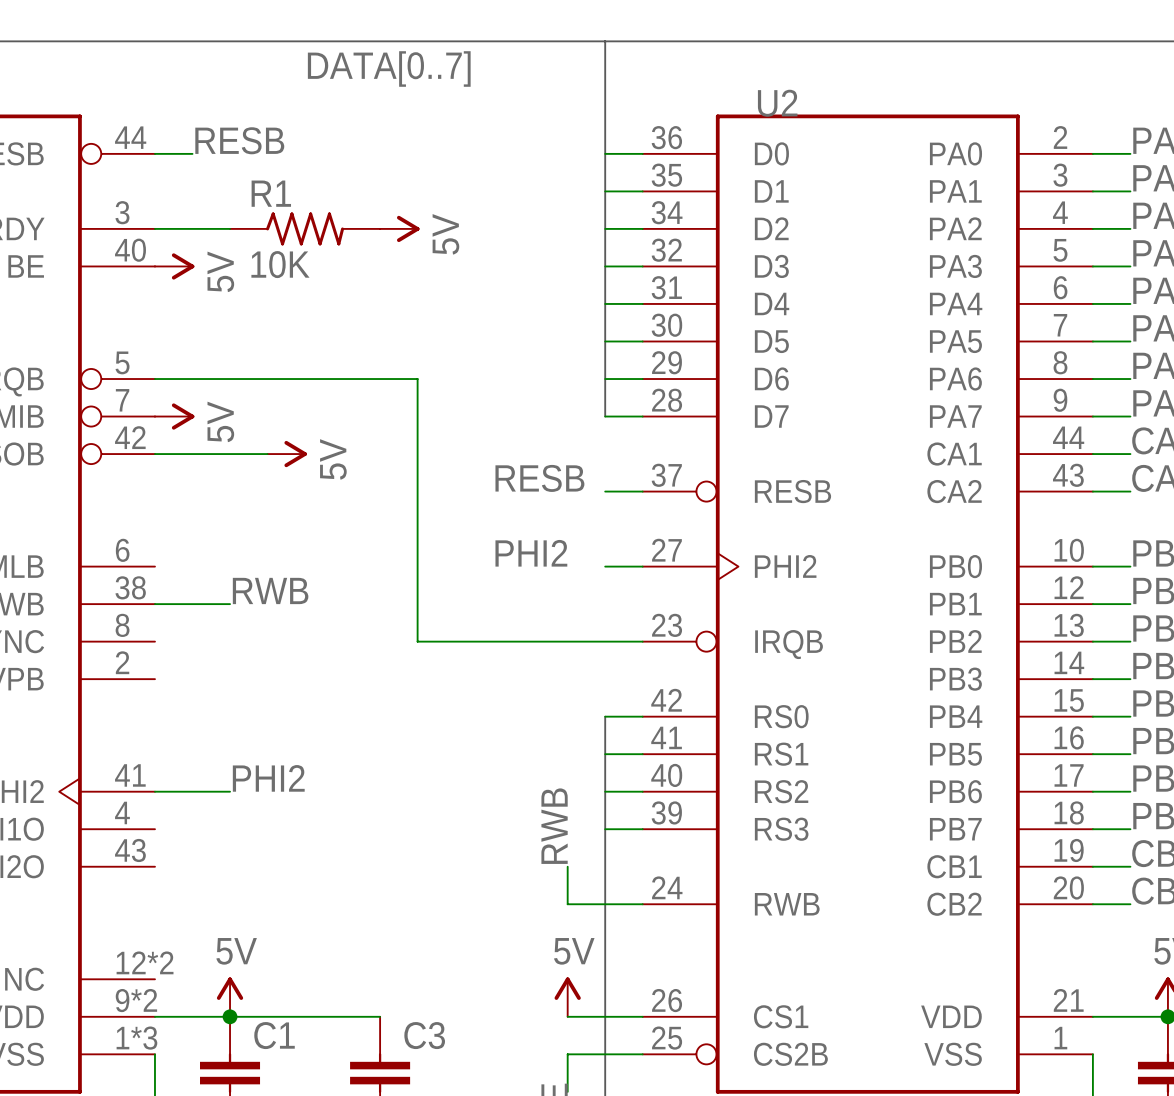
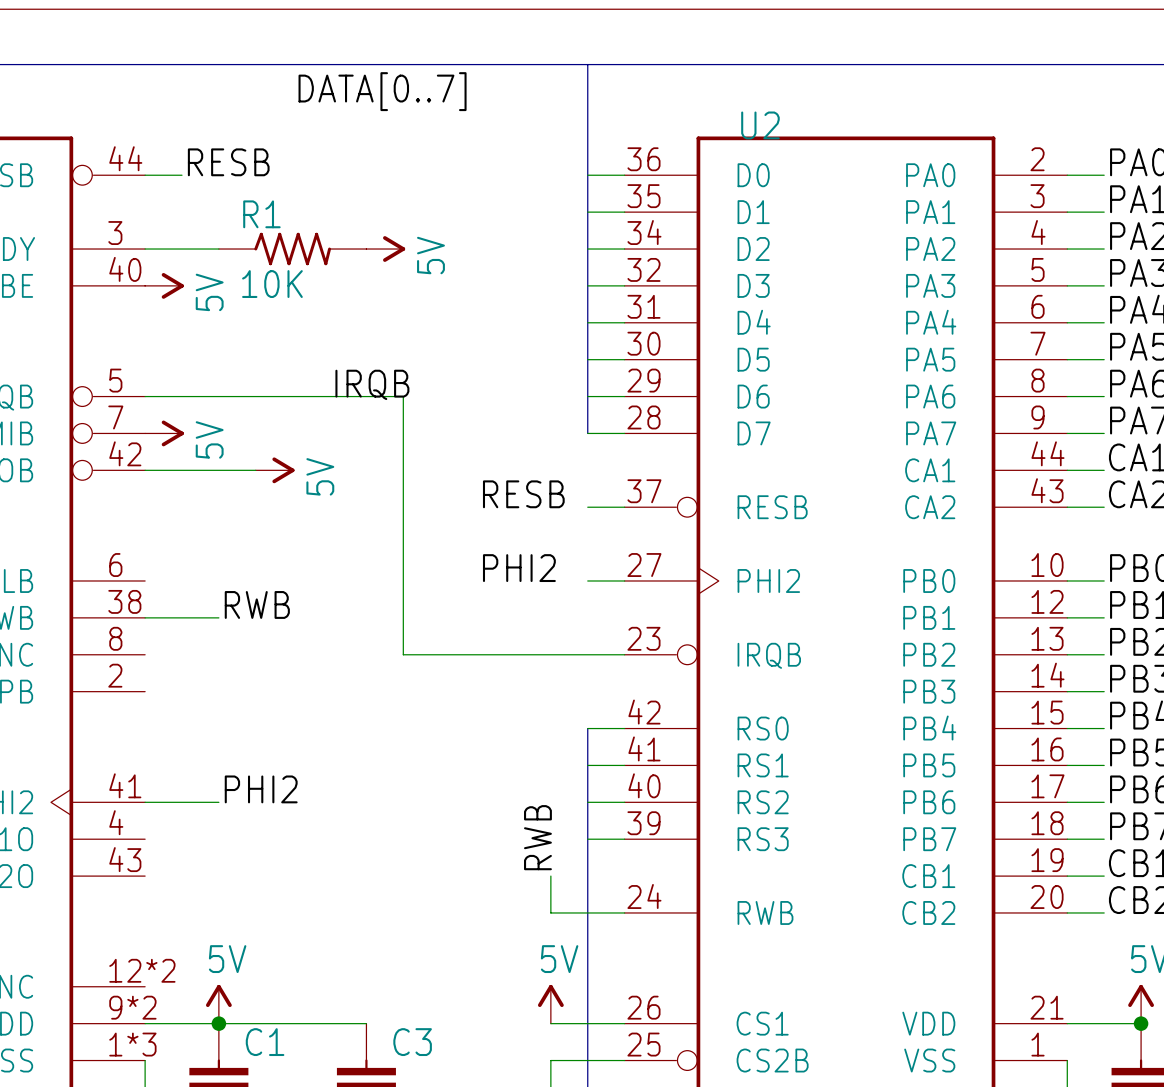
label: none -> IRQB (372, 384)

